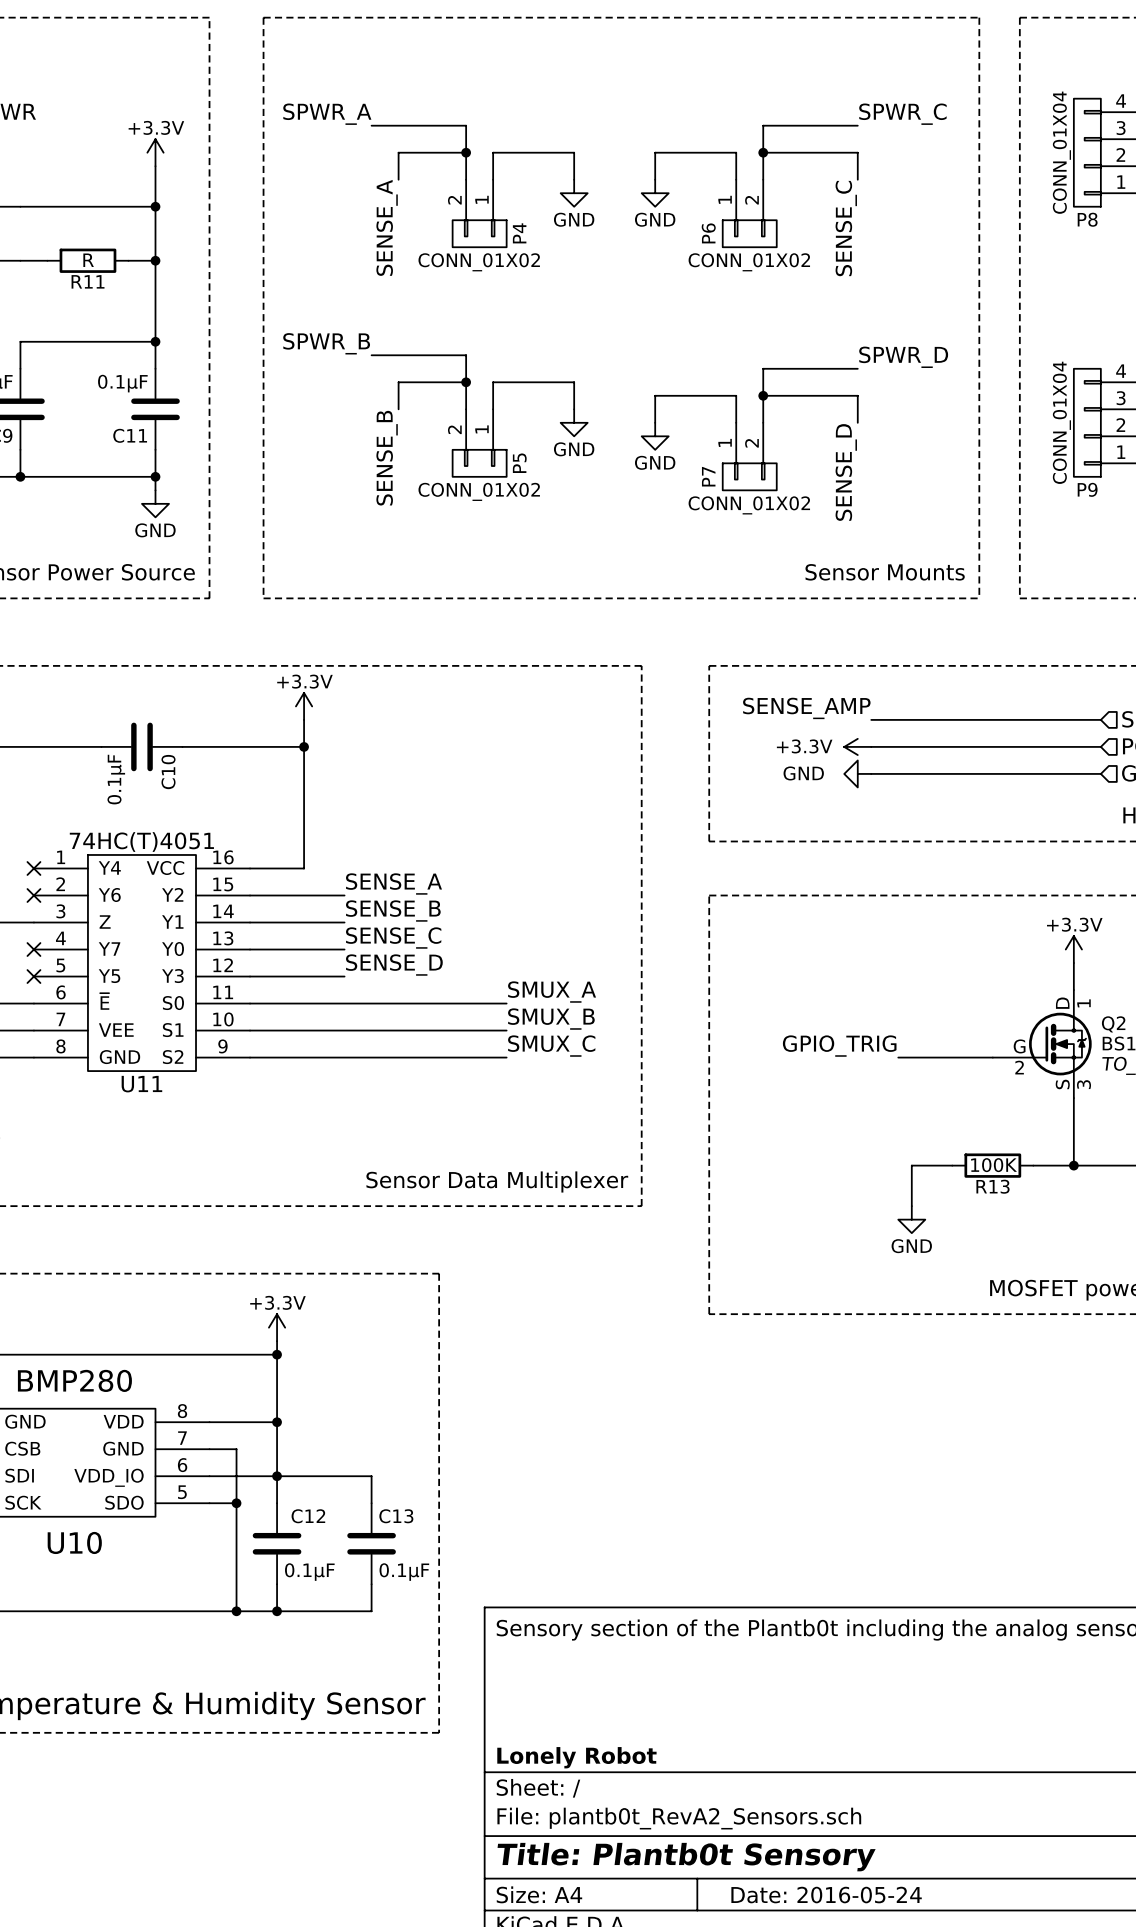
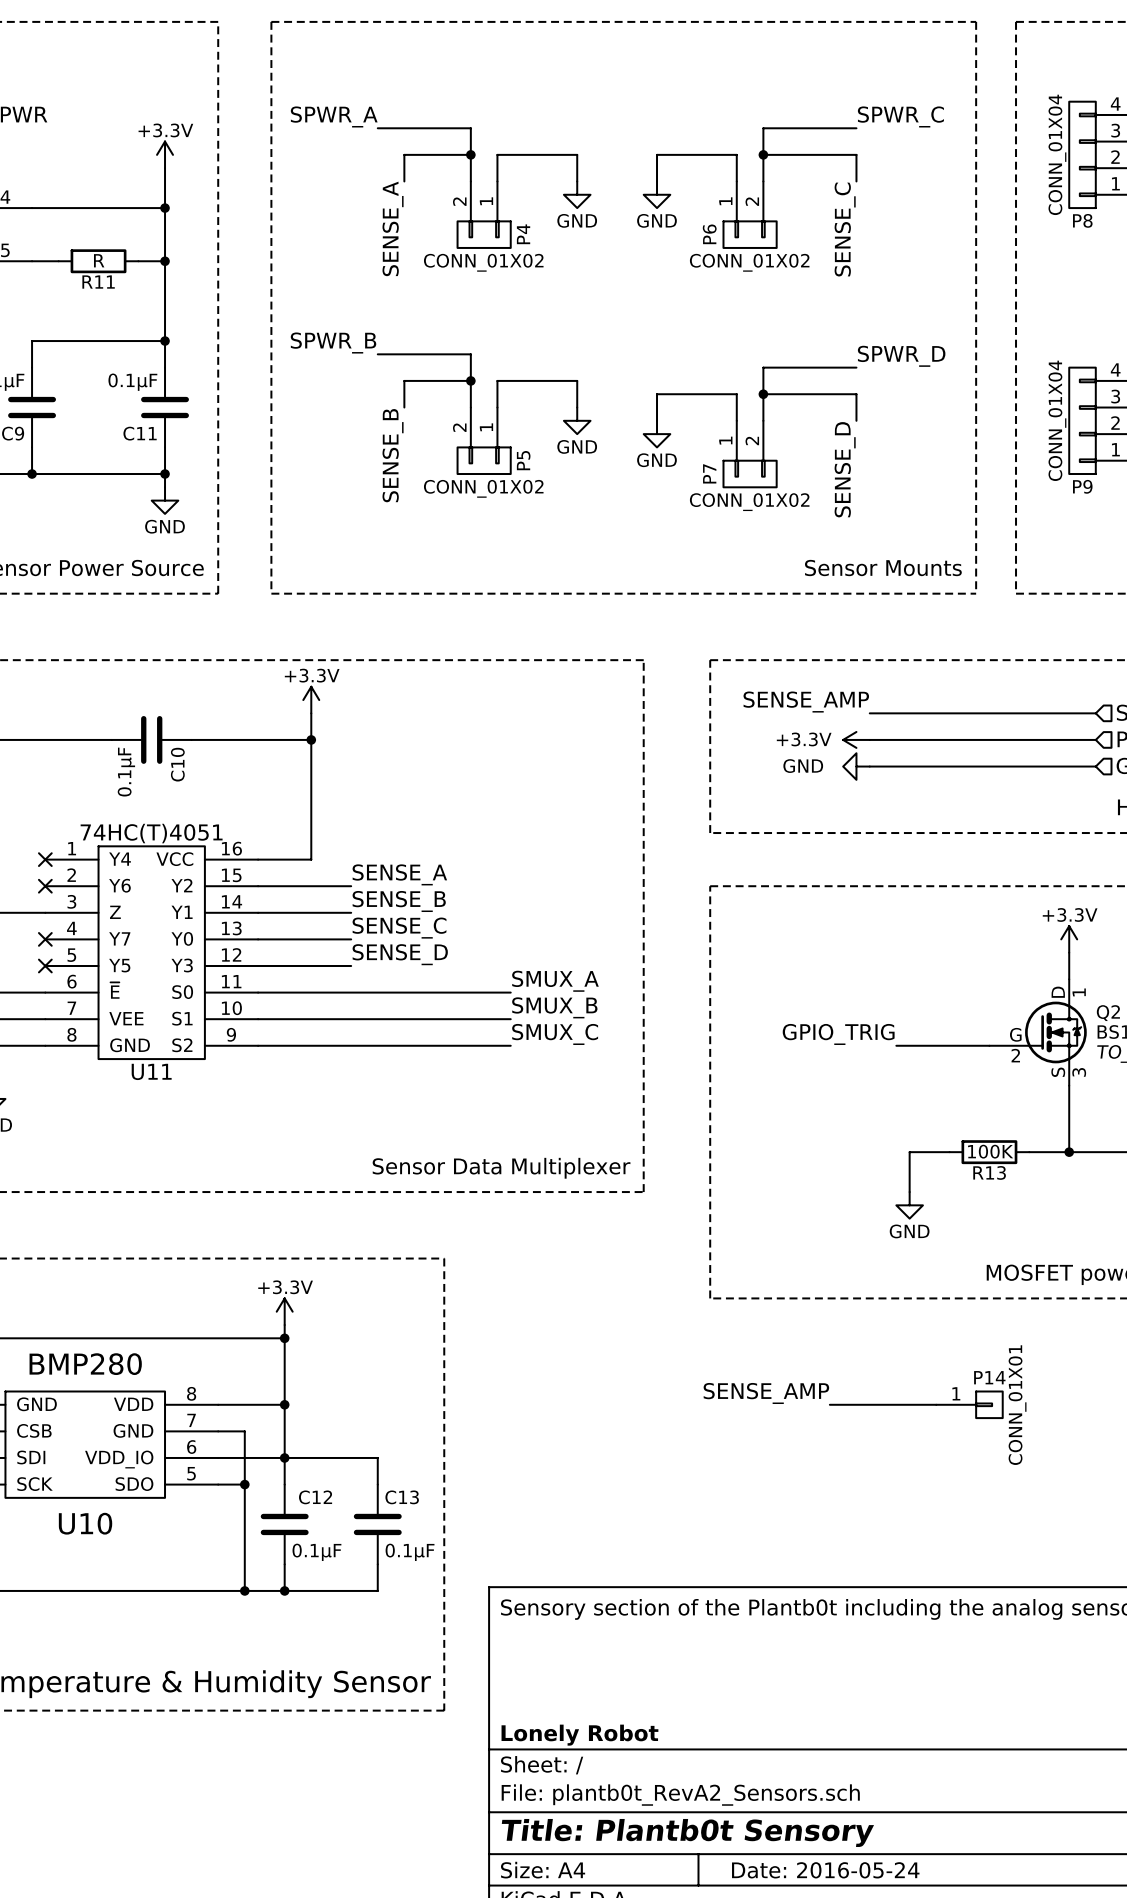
label: none -> SENSE_AMP (766, 1393)
wire: none -> (829, 1404) (936, 1404)
P14: none -> CONN_01X01 (969, 1404)

